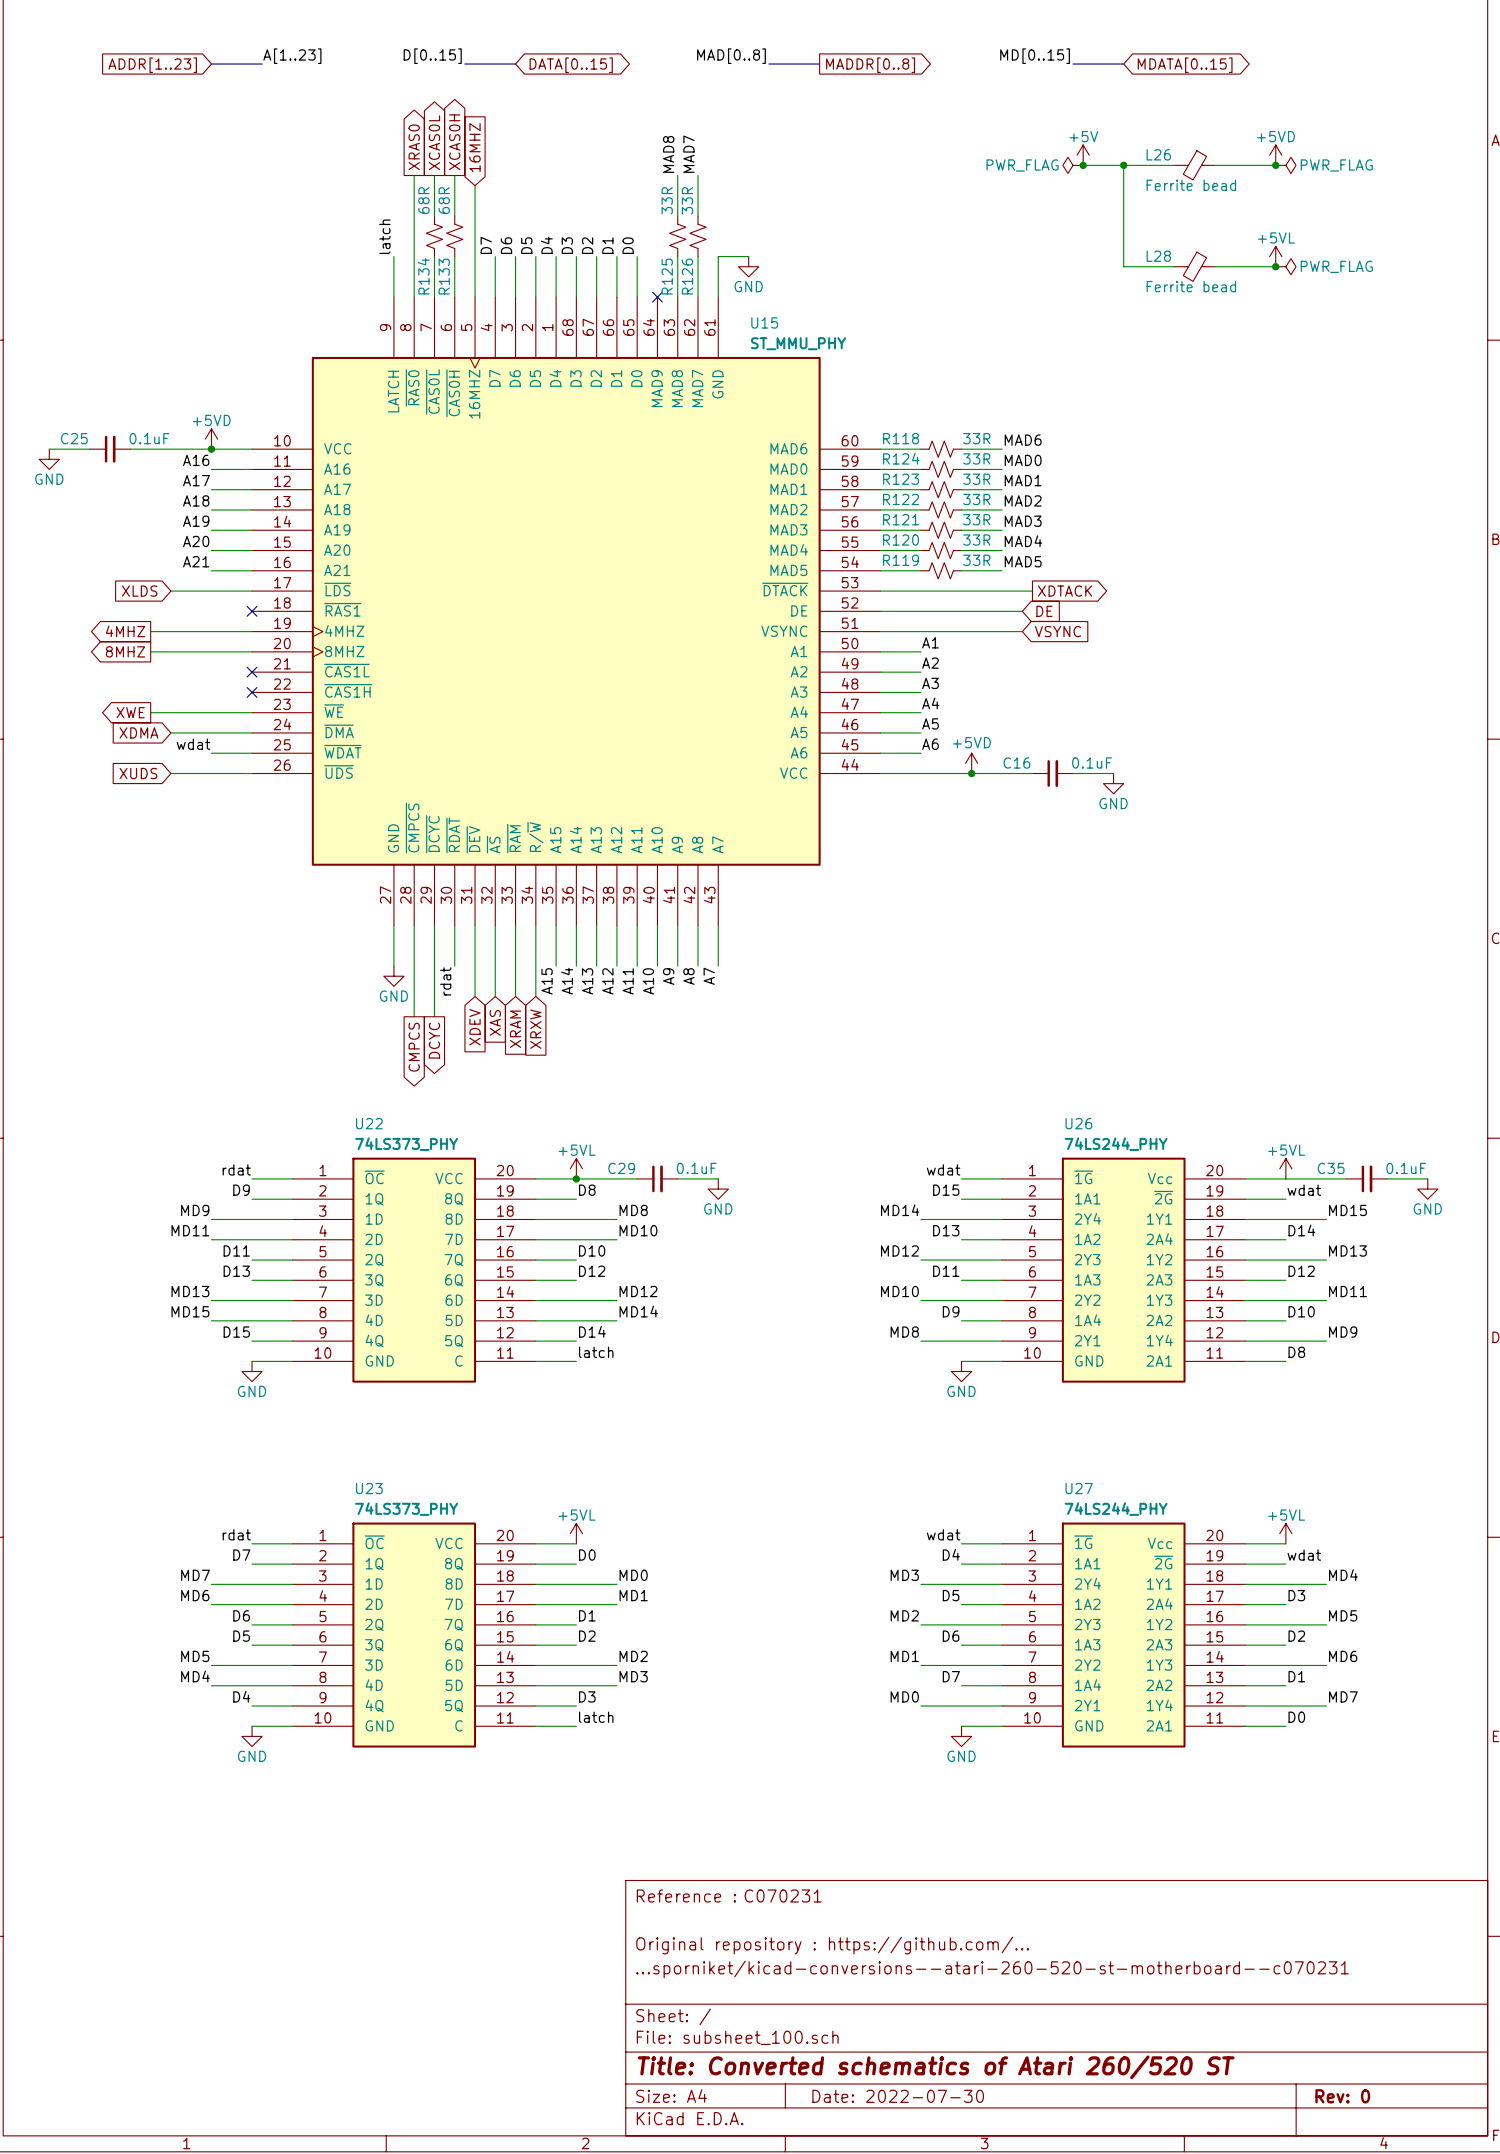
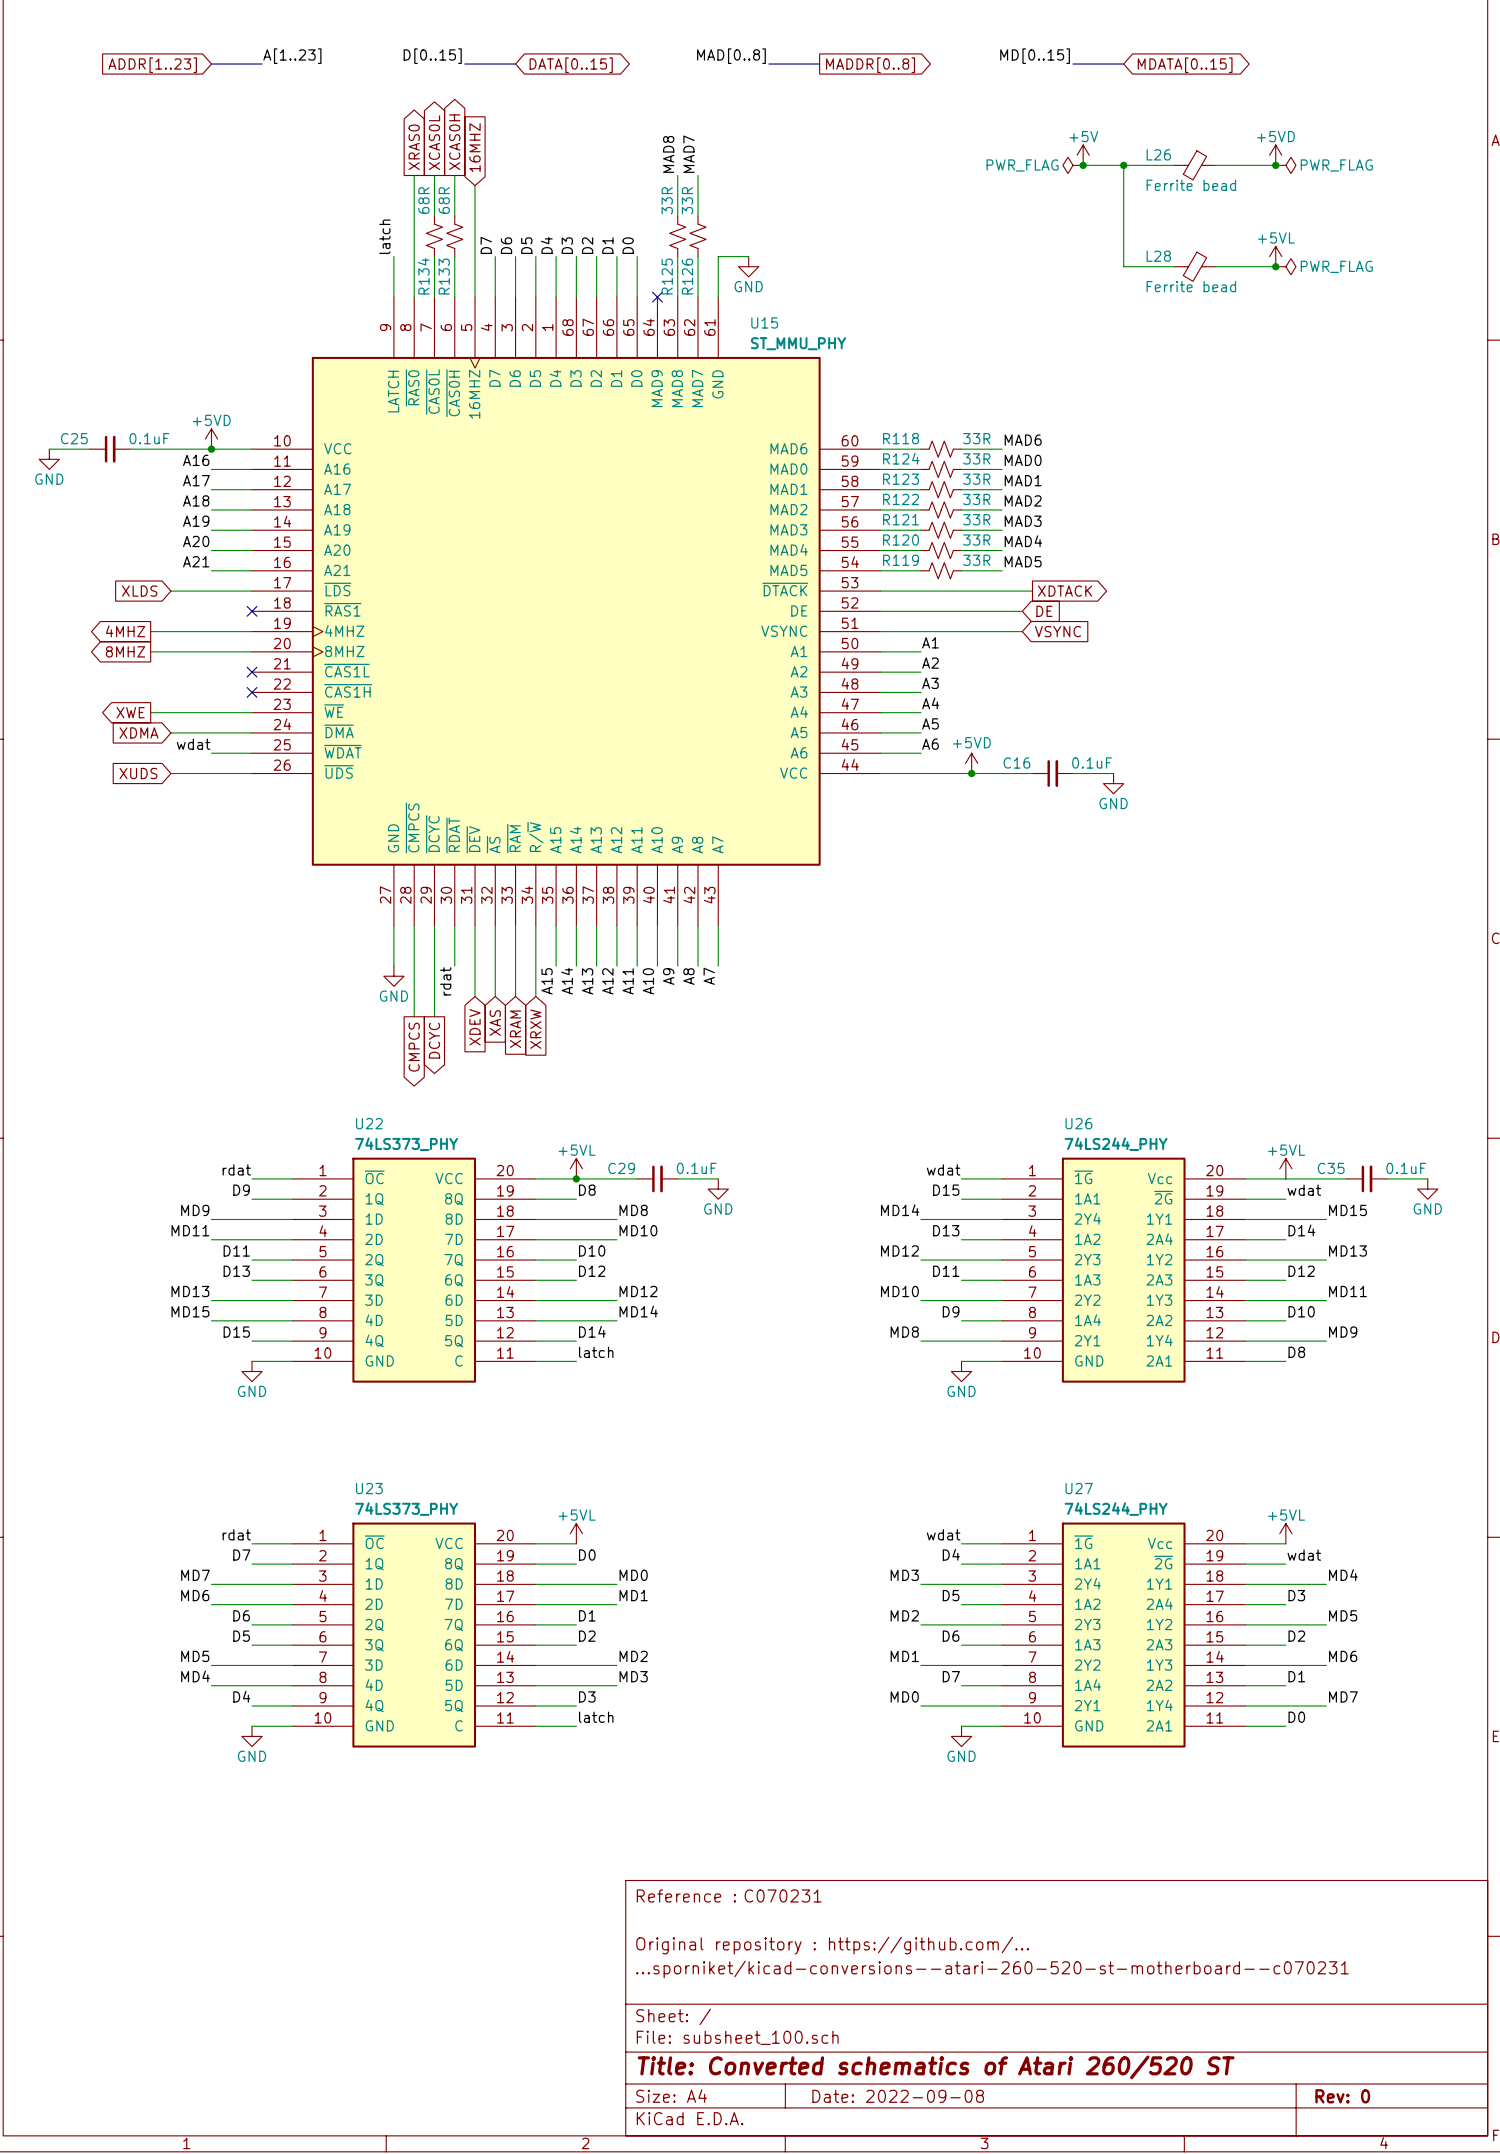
title block: Date: 2022-07-30 (898, 2096) -> Date: 2022-09-08 (898, 2096)

